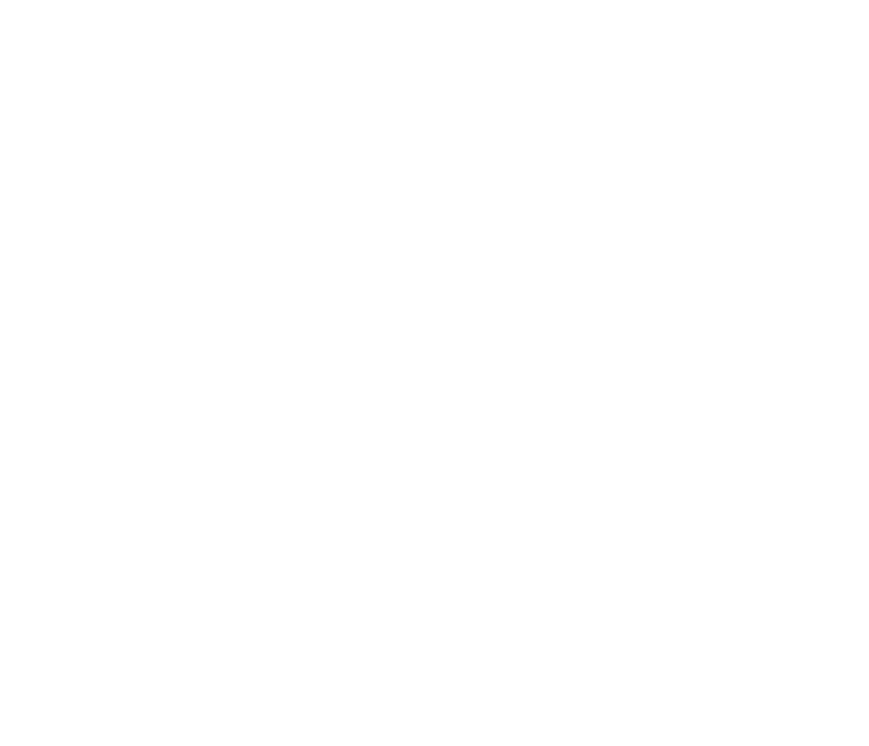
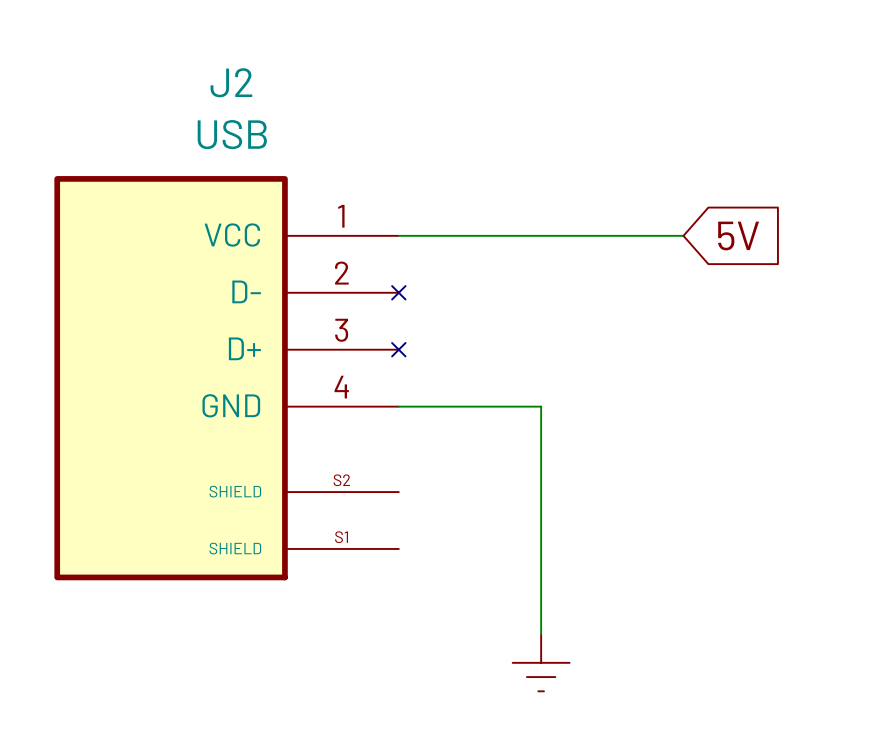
wire: none -> (398, 235) (683, 235)
global label: none -> 5V (738, 235)
J2: none -> USB (229, 378)
wire: none -> (398, 406) (541, 406) (541, 634)
power symbol: none -> (541, 662)

